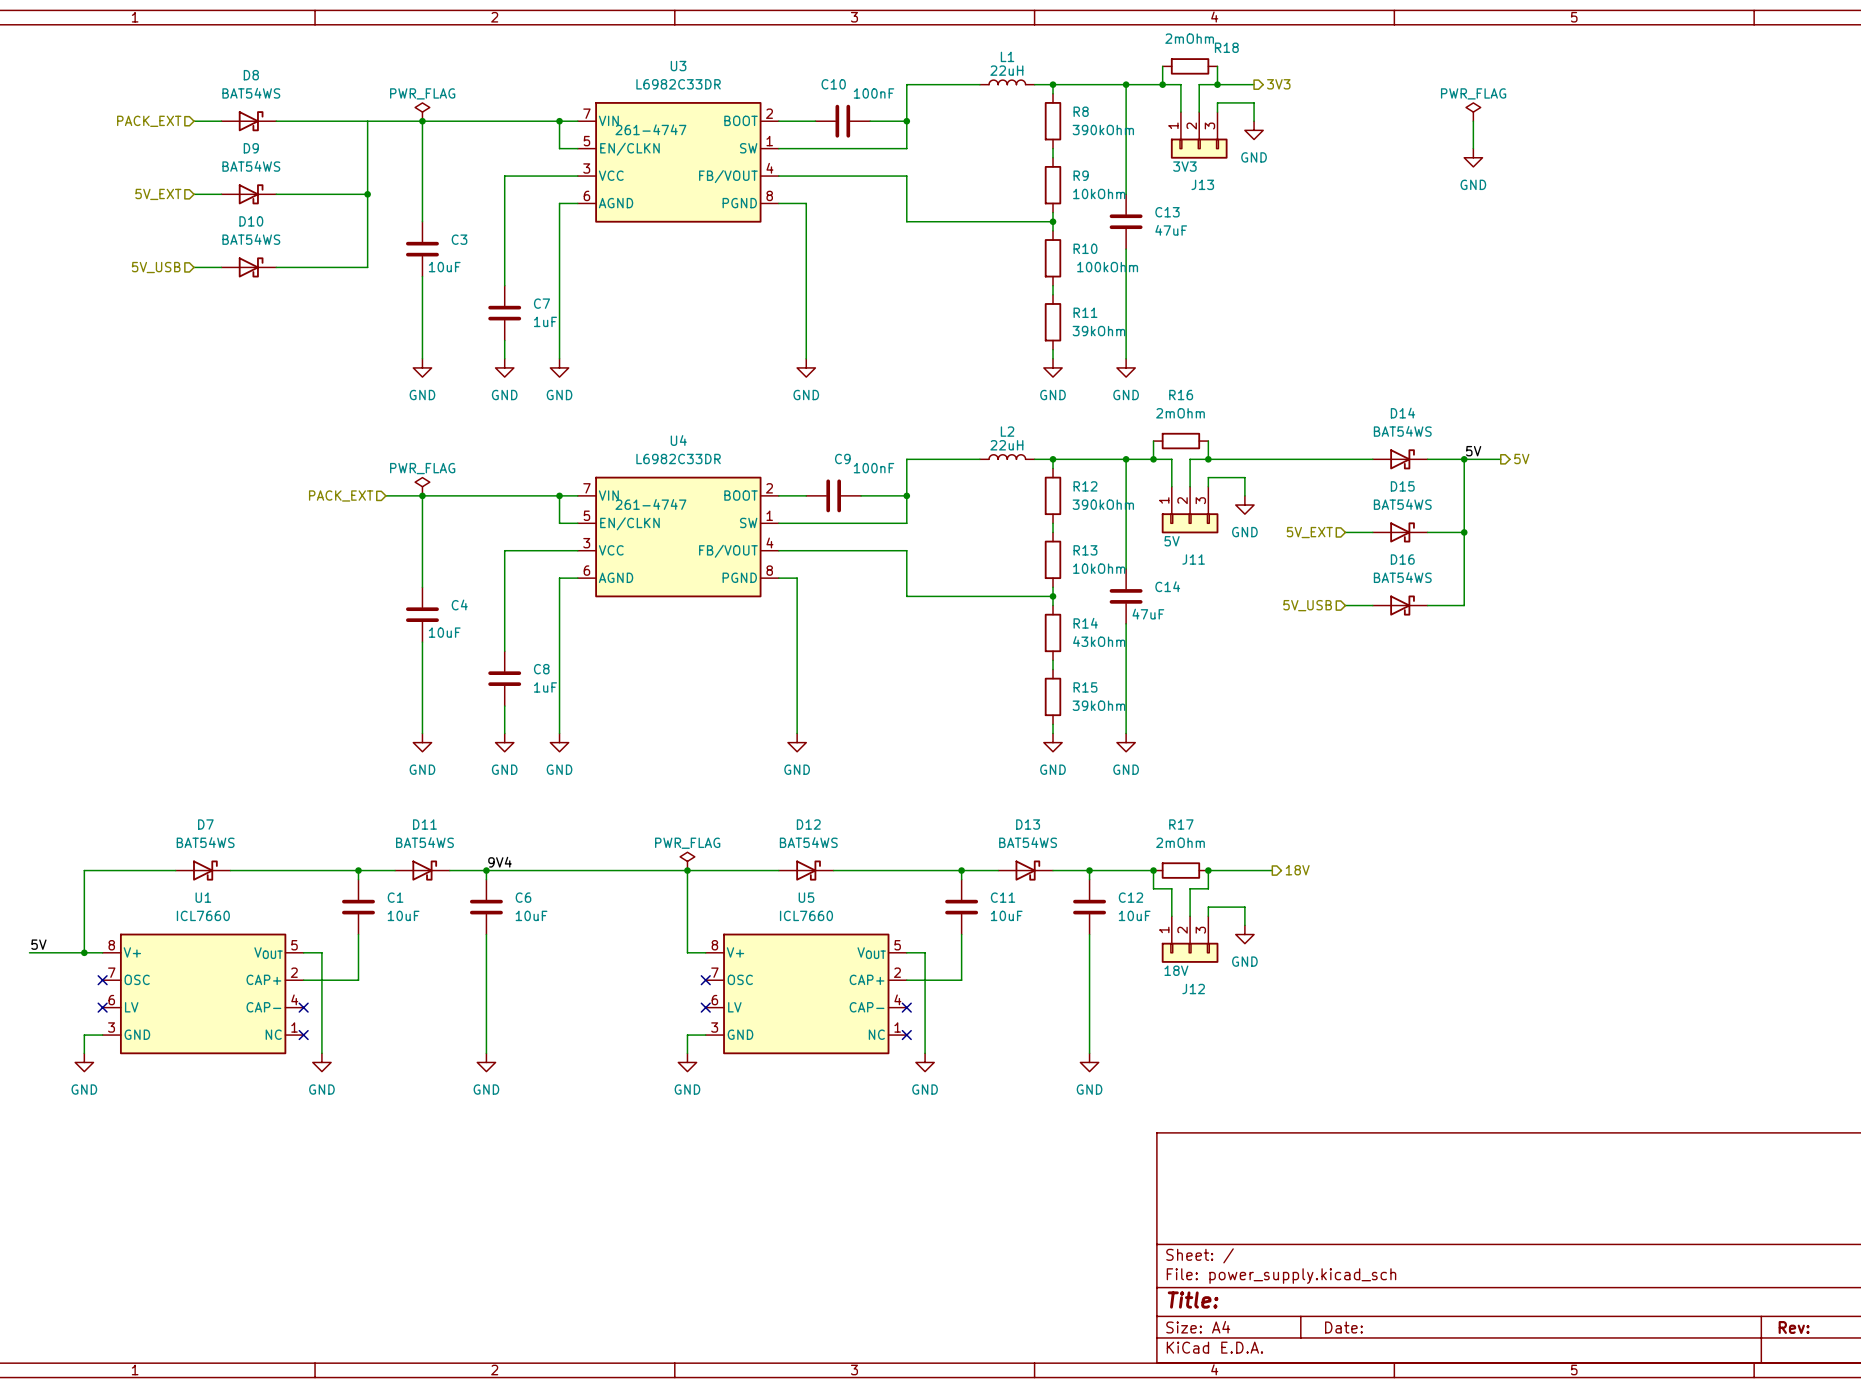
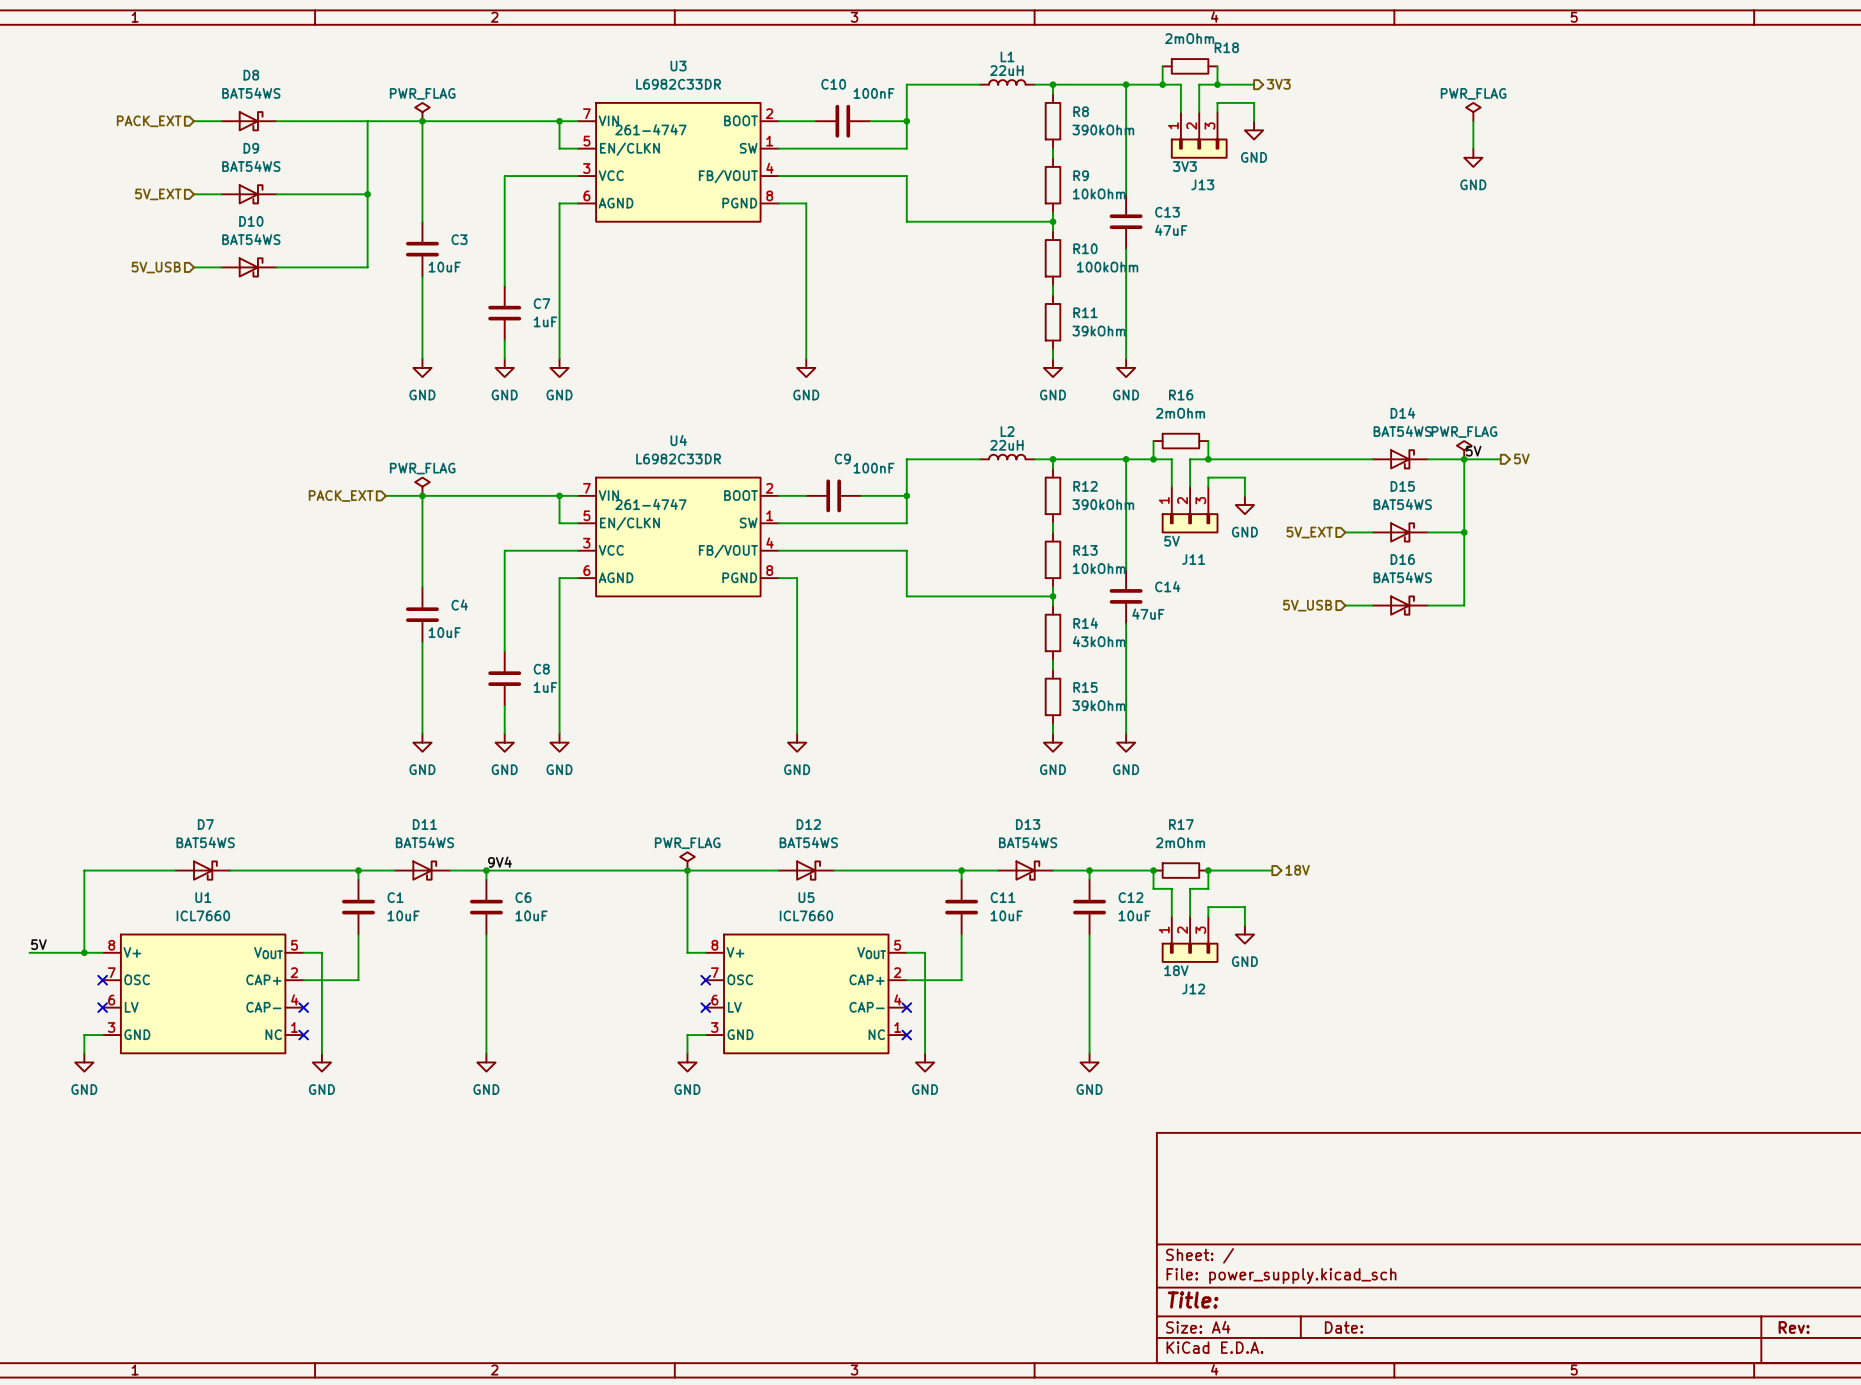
power symbol: none -> PWR_FLAG (1464, 450)

